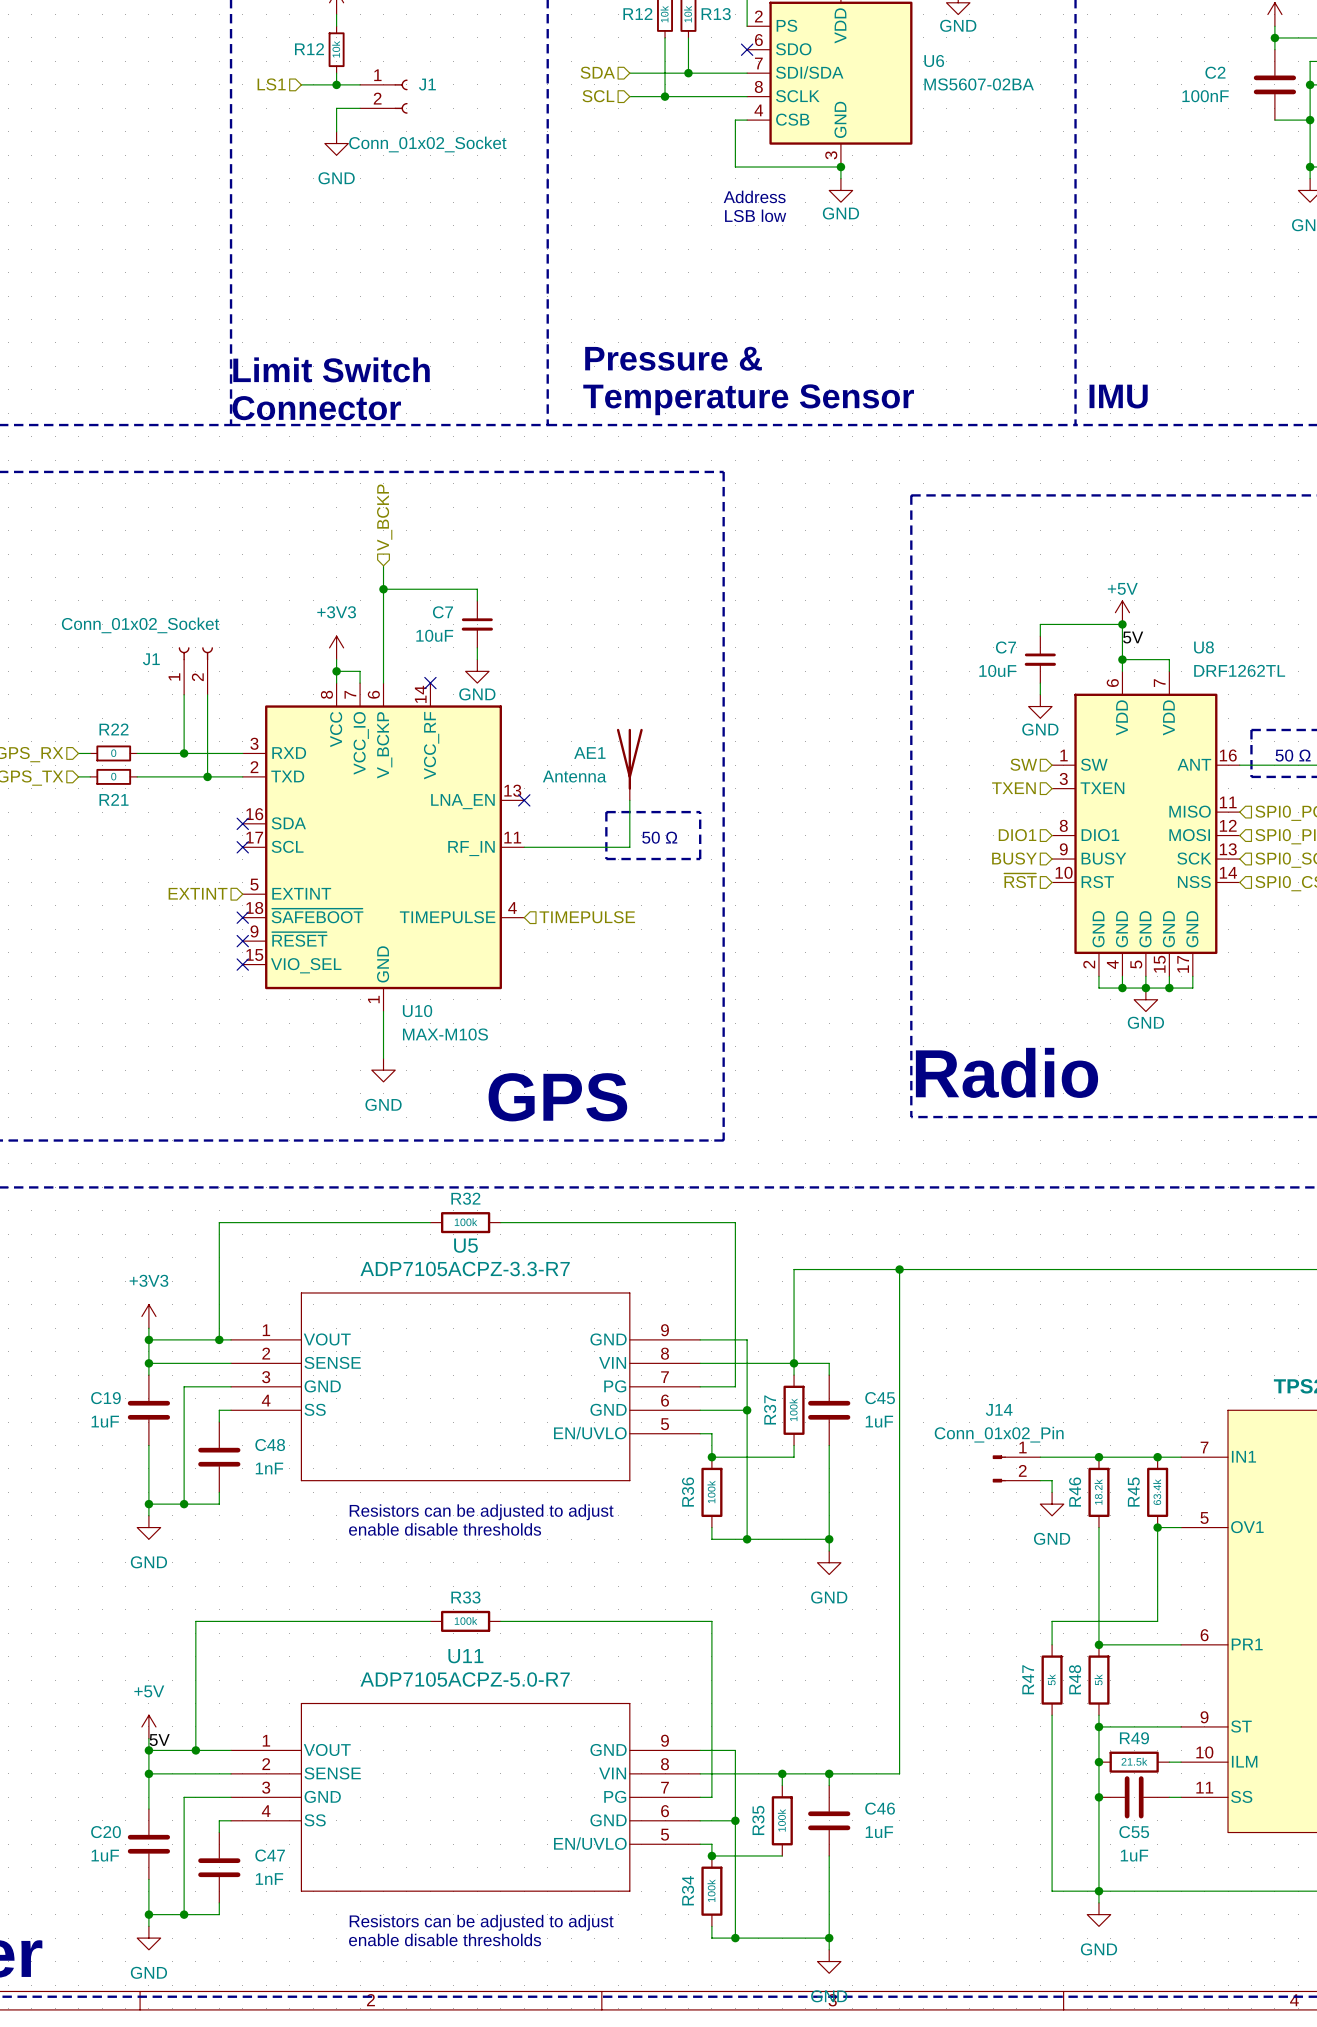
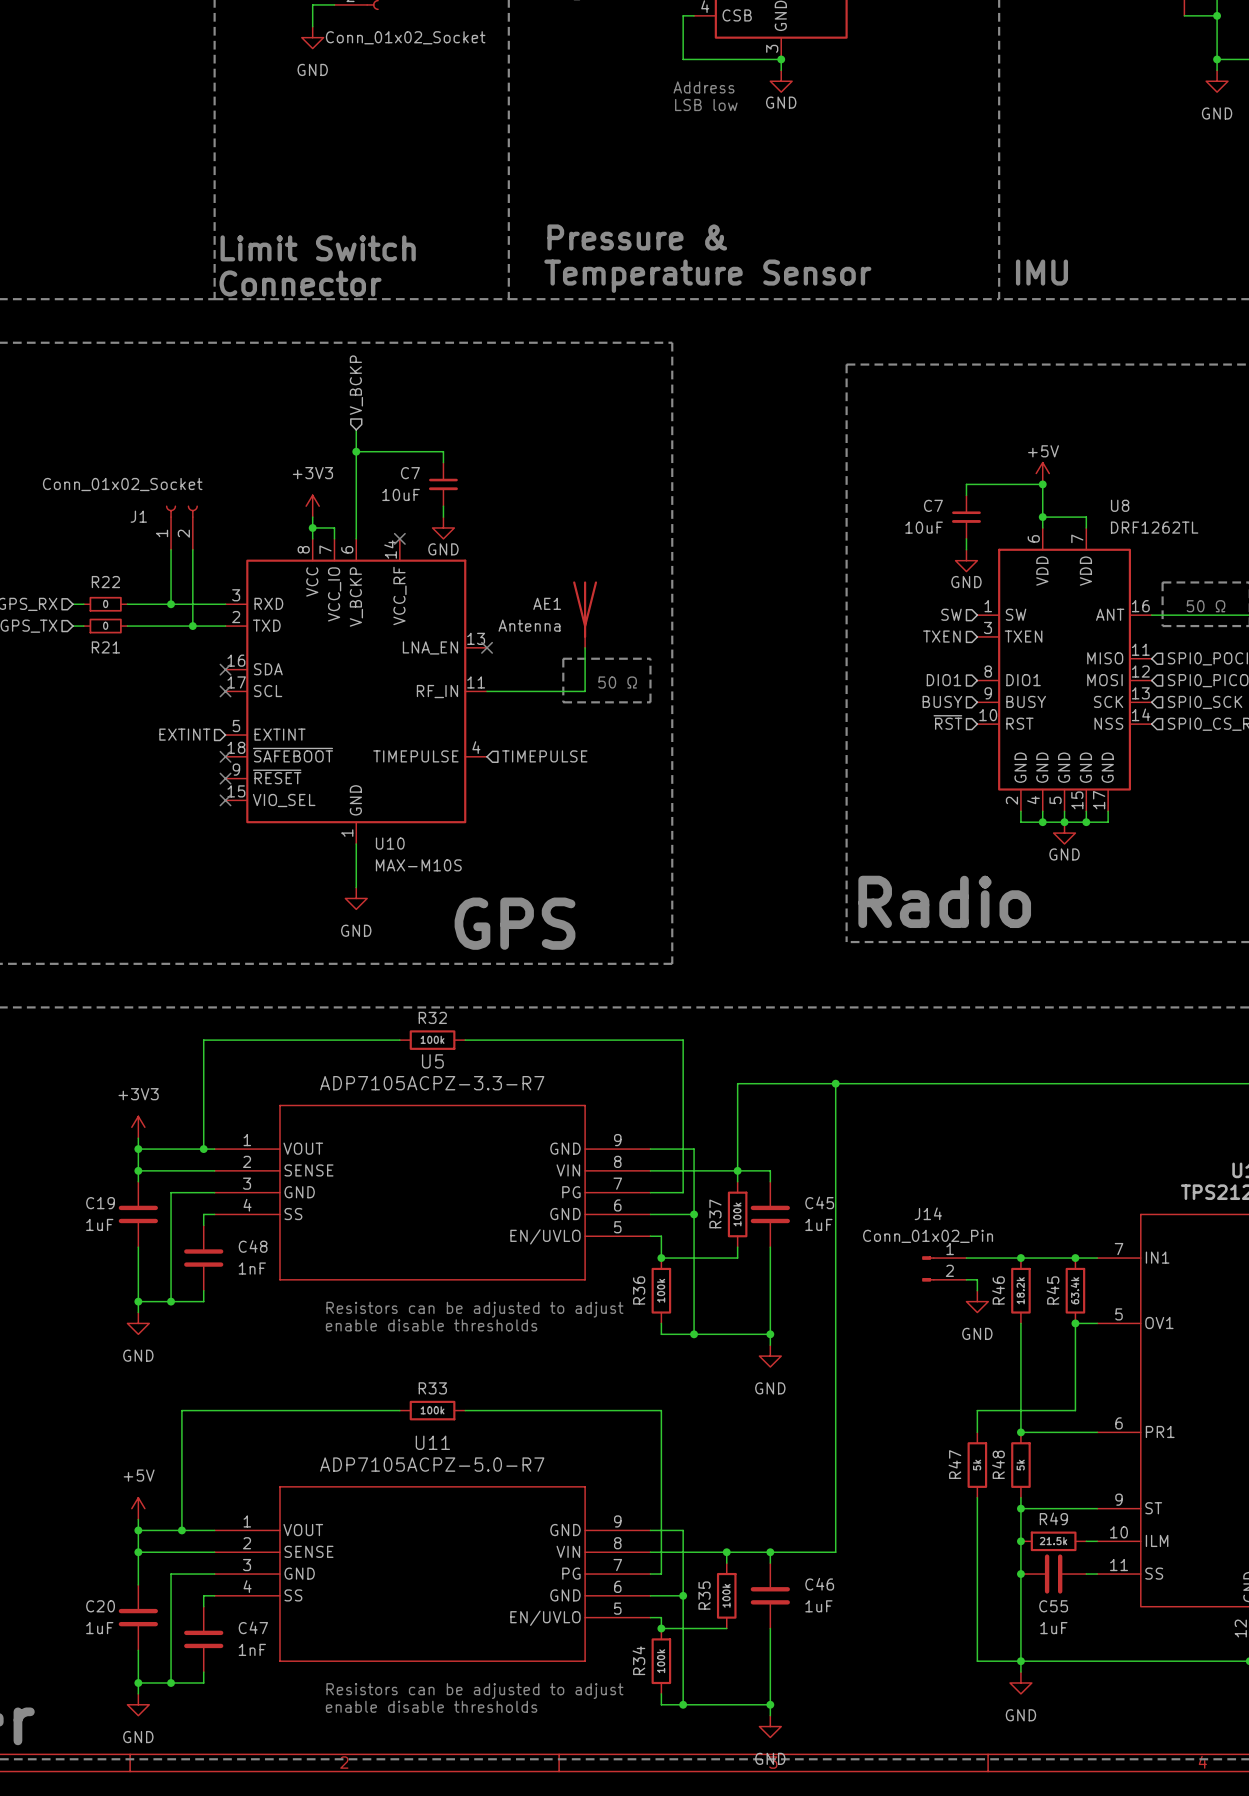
label: 5V (1133, 637) -> none
label: 5V (159, 1740) -> none

